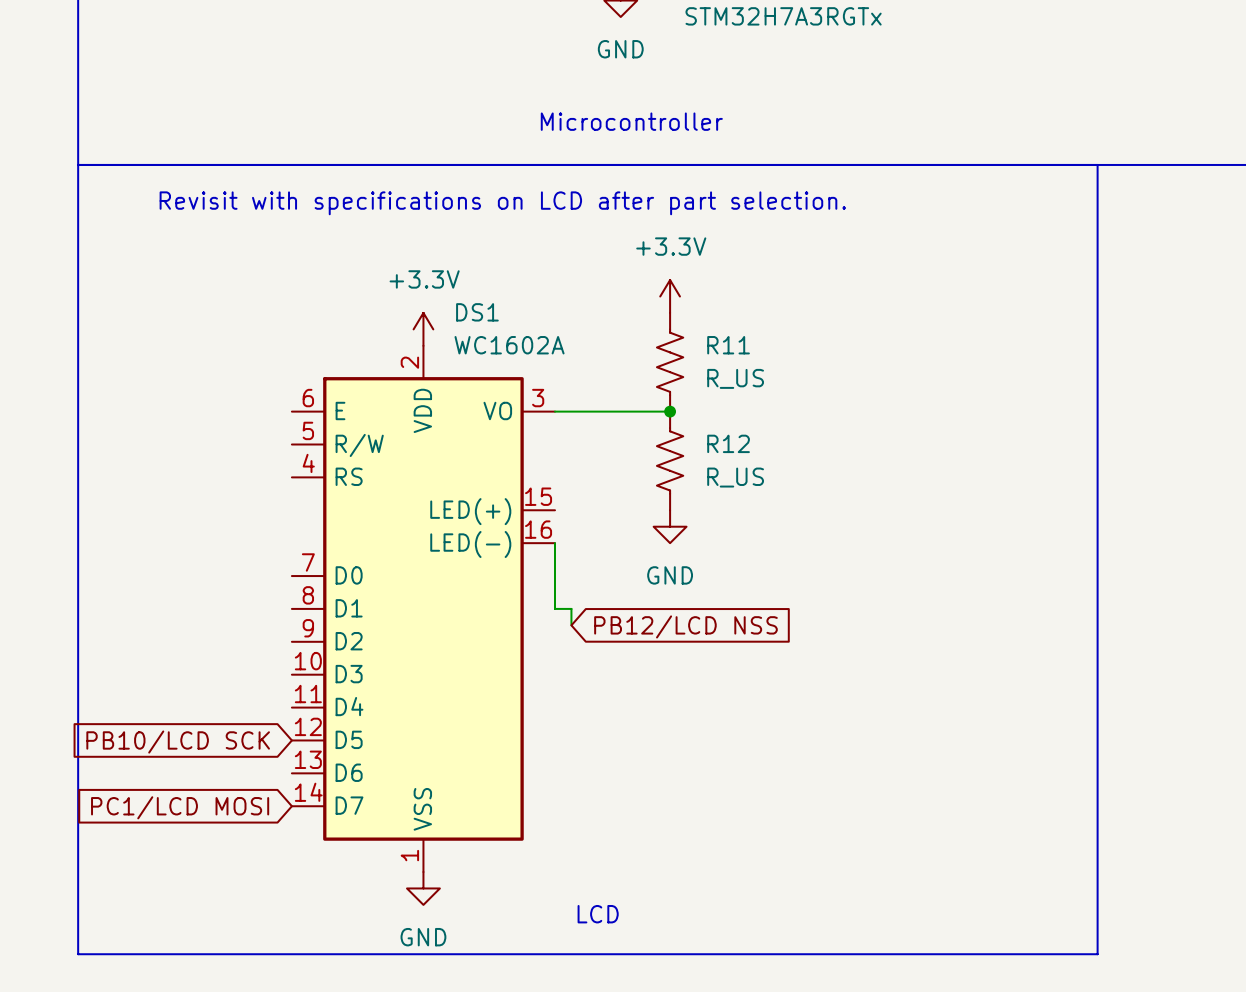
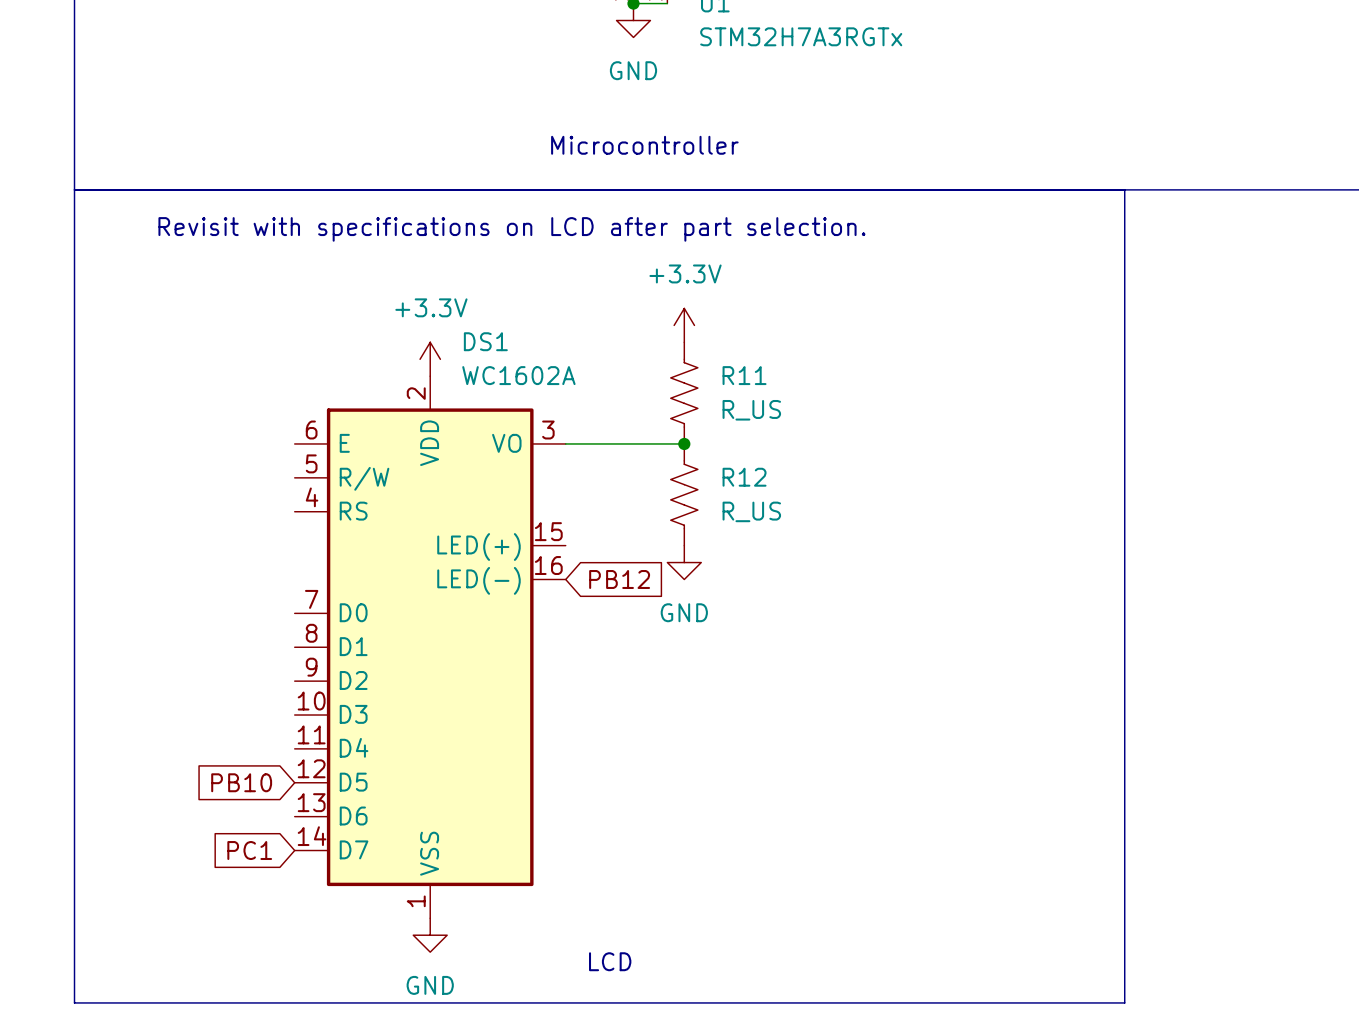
wire: (554, 543) (554, 608) (571, 608) (571, 625) -> none
global label: none -> PB12 (619, 579)
global label: PB12/LCD NSS (685, 626) -> none
global label: PB10/LCD SCK (178, 742) -> PB10 (241, 782)
global label: PC1/LCD MOSI (180, 807) -> PC1 (249, 850)

